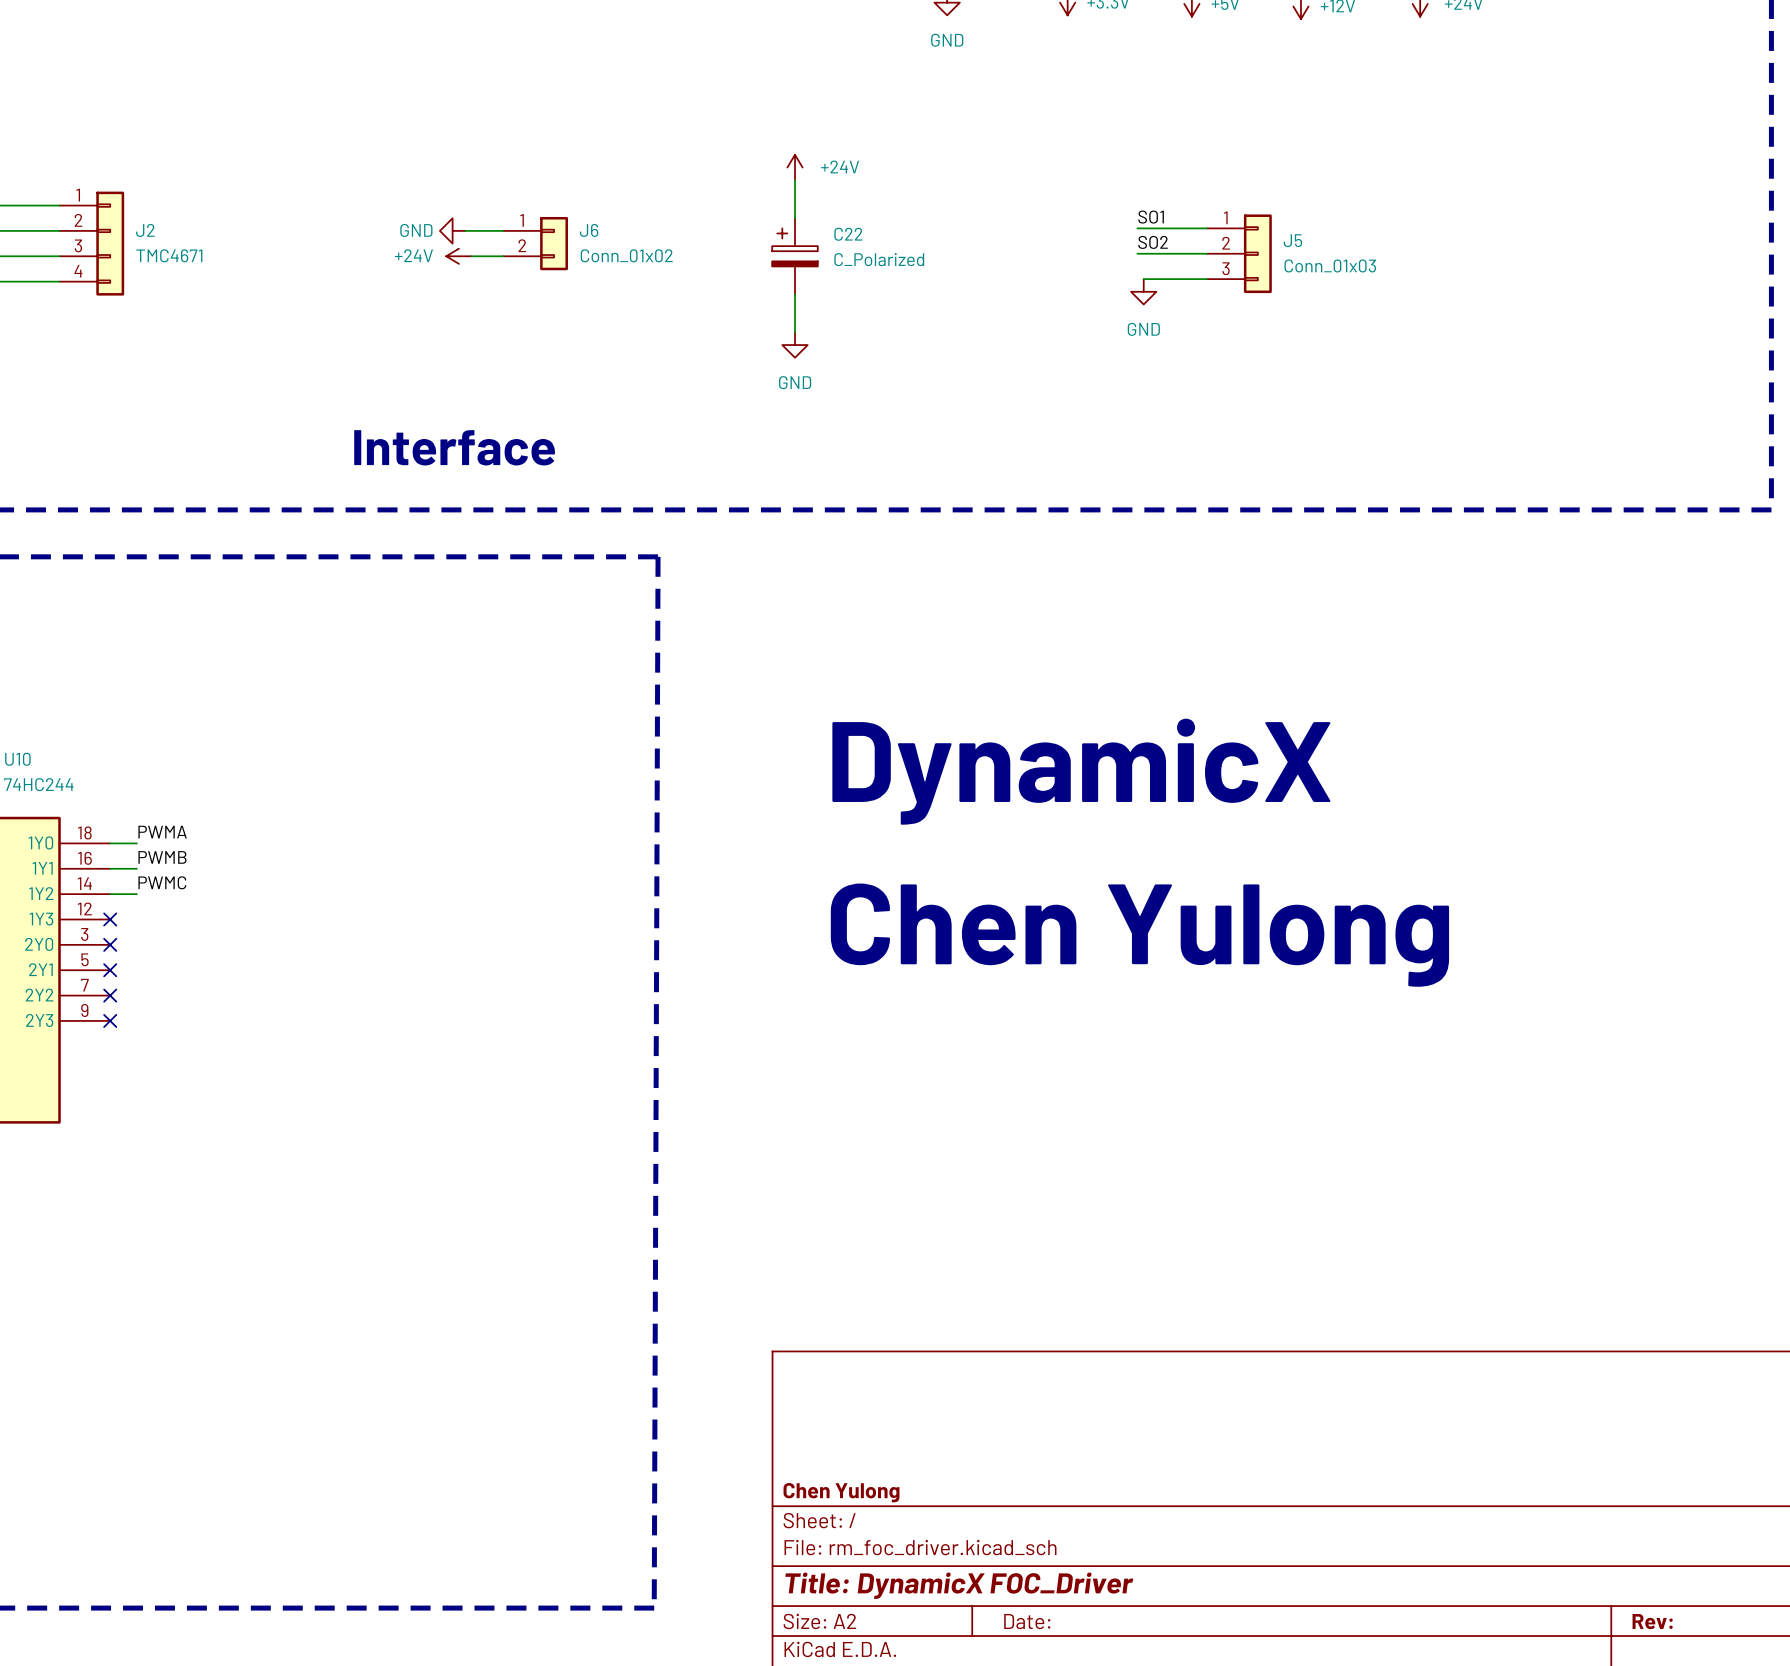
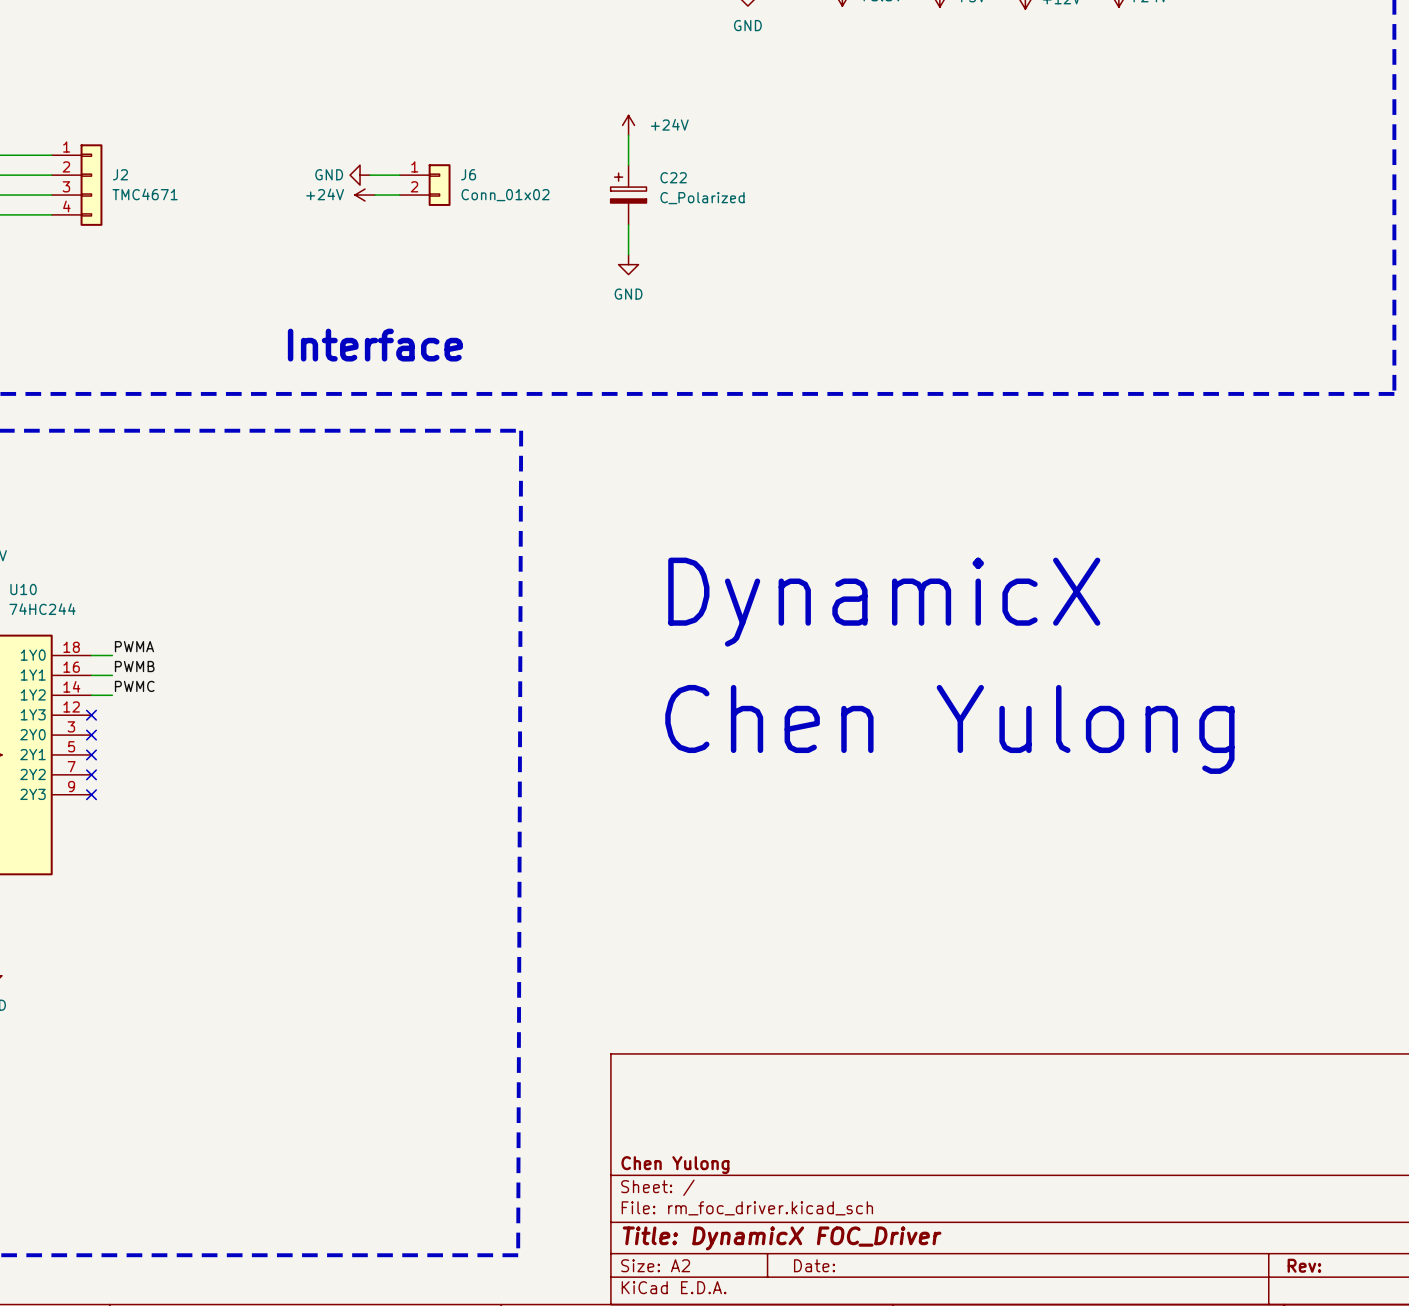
label: SO1 (1151, 217) -> none
wire: (1137, 228) (1207, 228) -> none
label: SO2 (1153, 242) -> none
wire: (1137, 253) (1207, 253) -> none
J5: Conn_01x03 (1239, 253) -> none
wire: (1143, 279) (1207, 279) -> none
power symbol: GND (1143, 291) -> none

